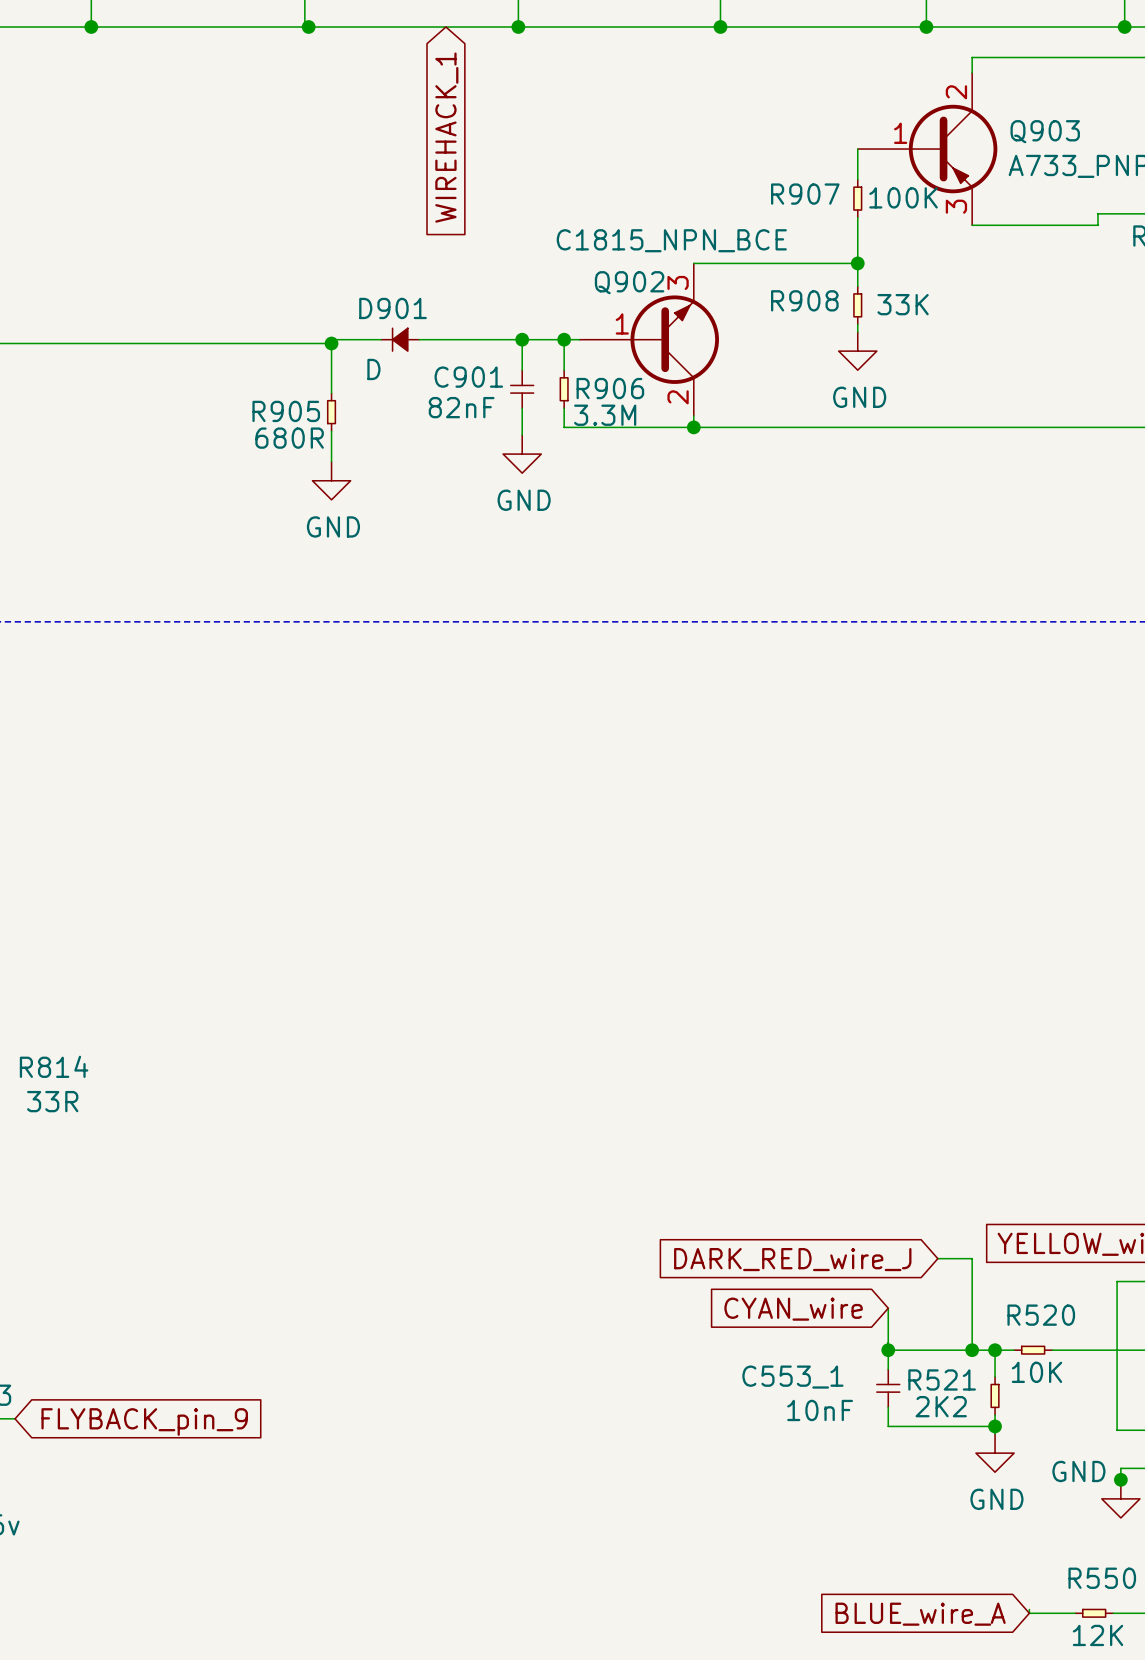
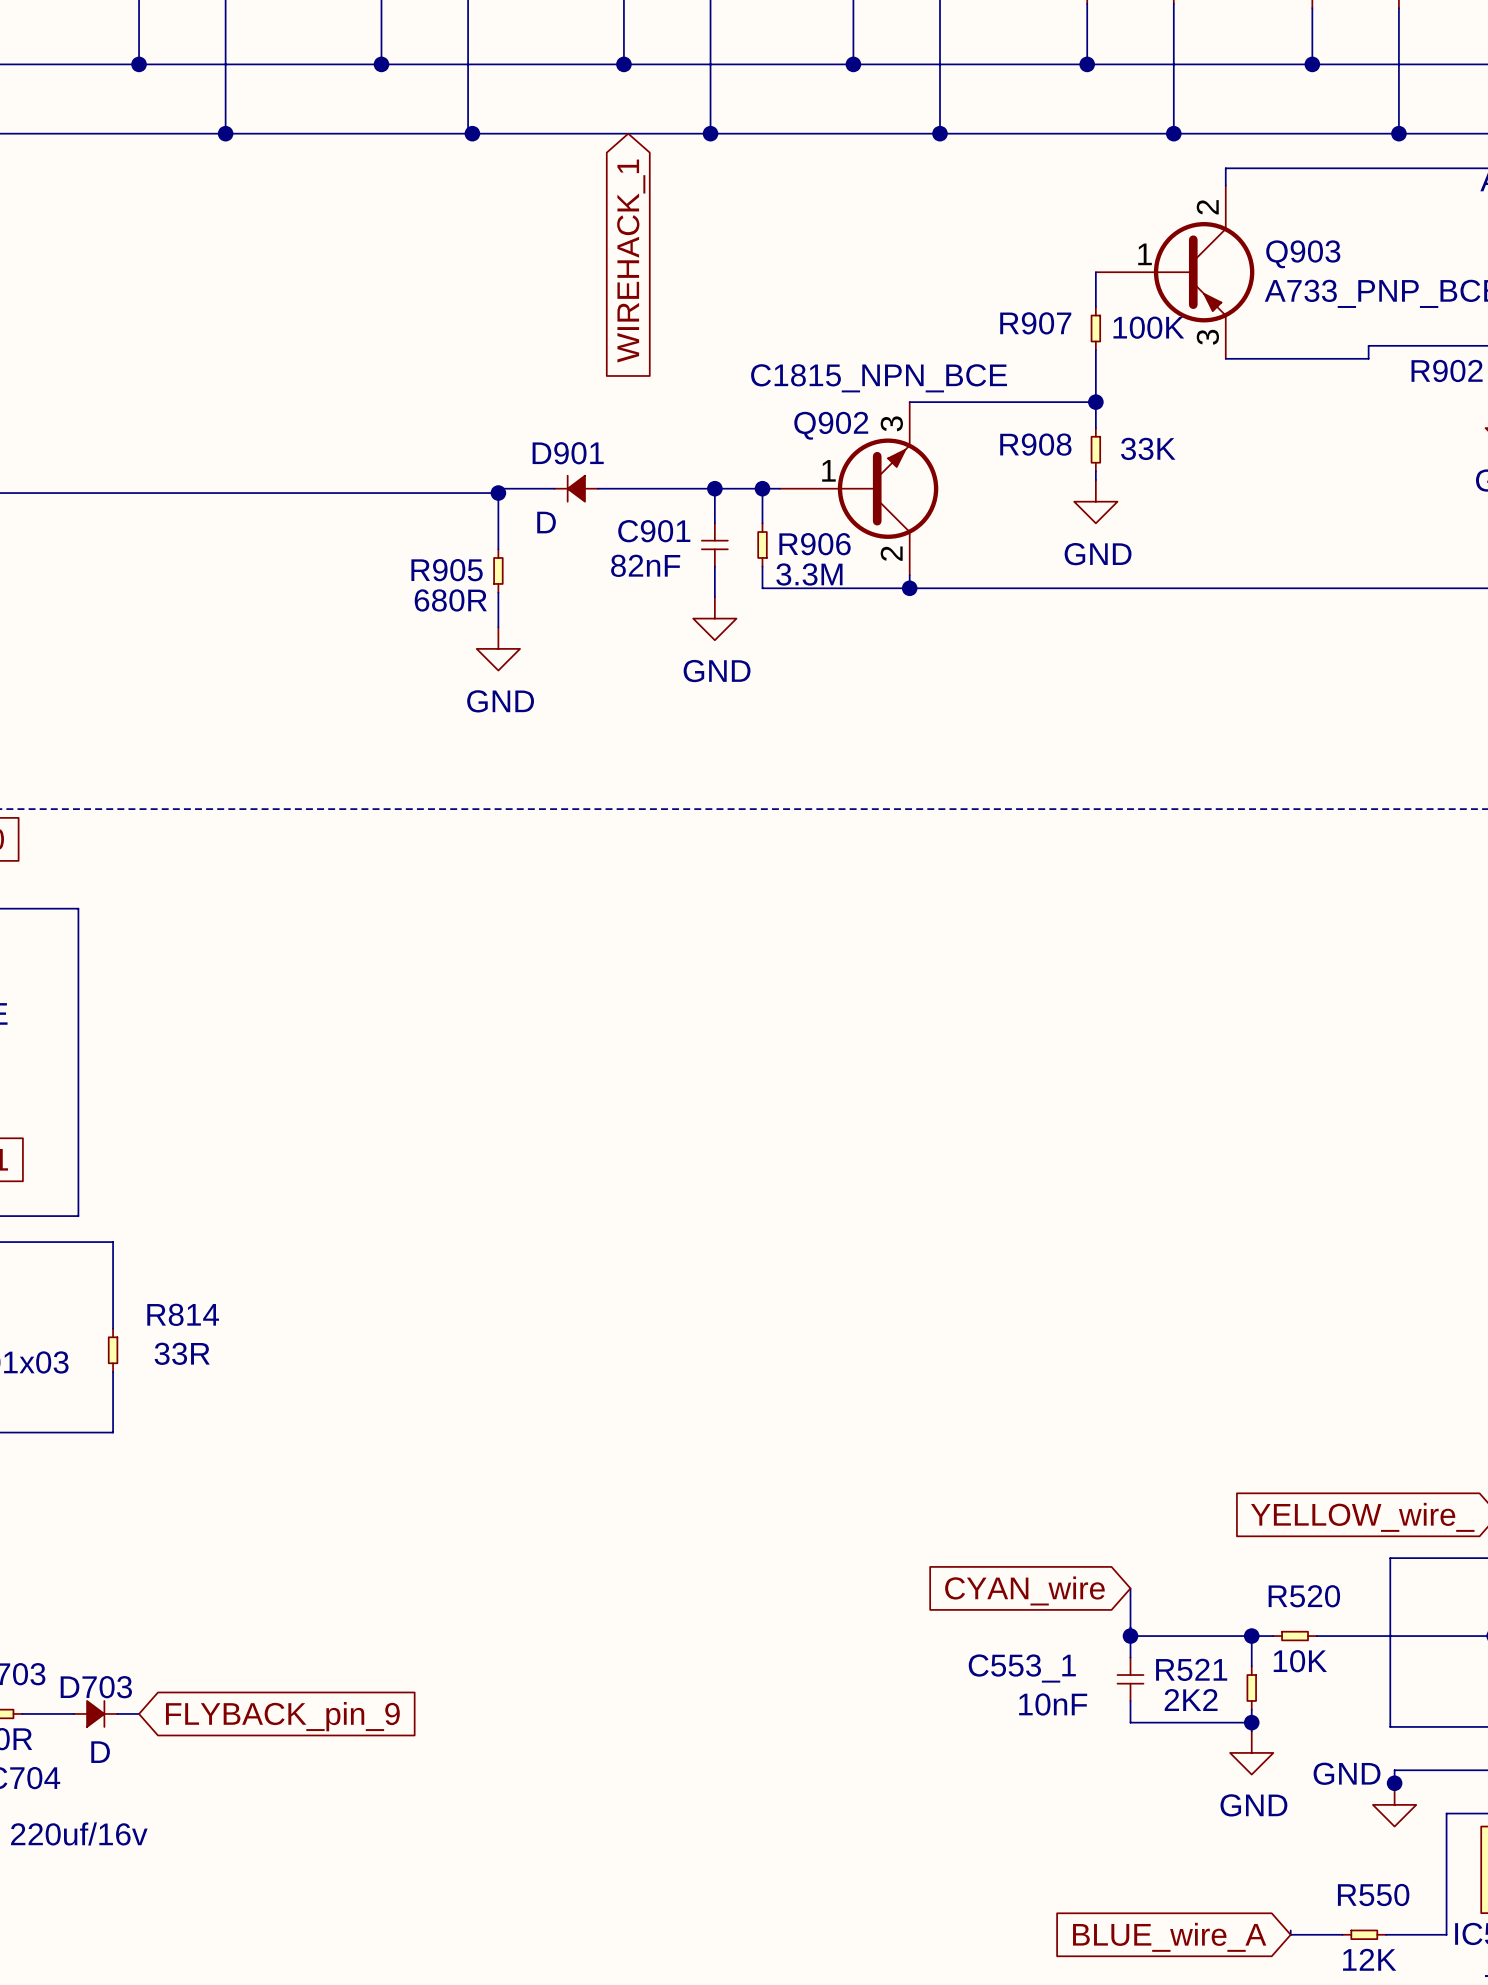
wire: (937, 1258) (972, 1258) (972, 1350) -> none
global label: DARK_RED_wire_J (792, 1259) -> none
junction: (972, 1350) -> none

